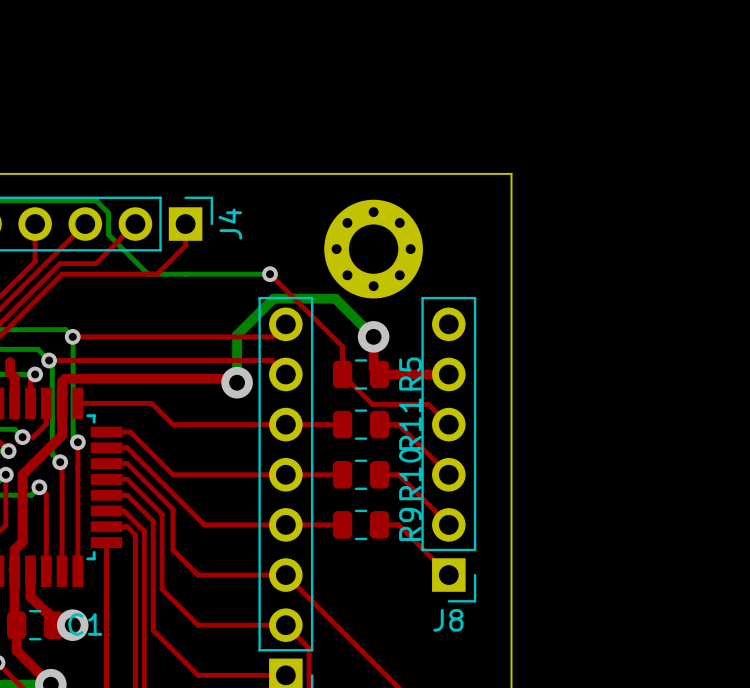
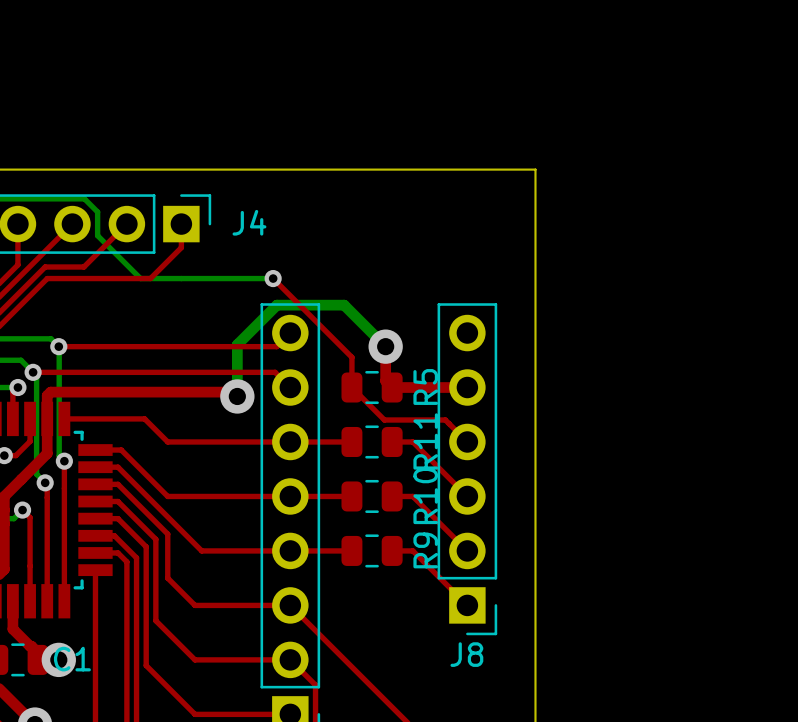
J4 name rotation: 0° (230, 224) -> 90° clockwise (249, 222)
part: (373, 249) -> none

